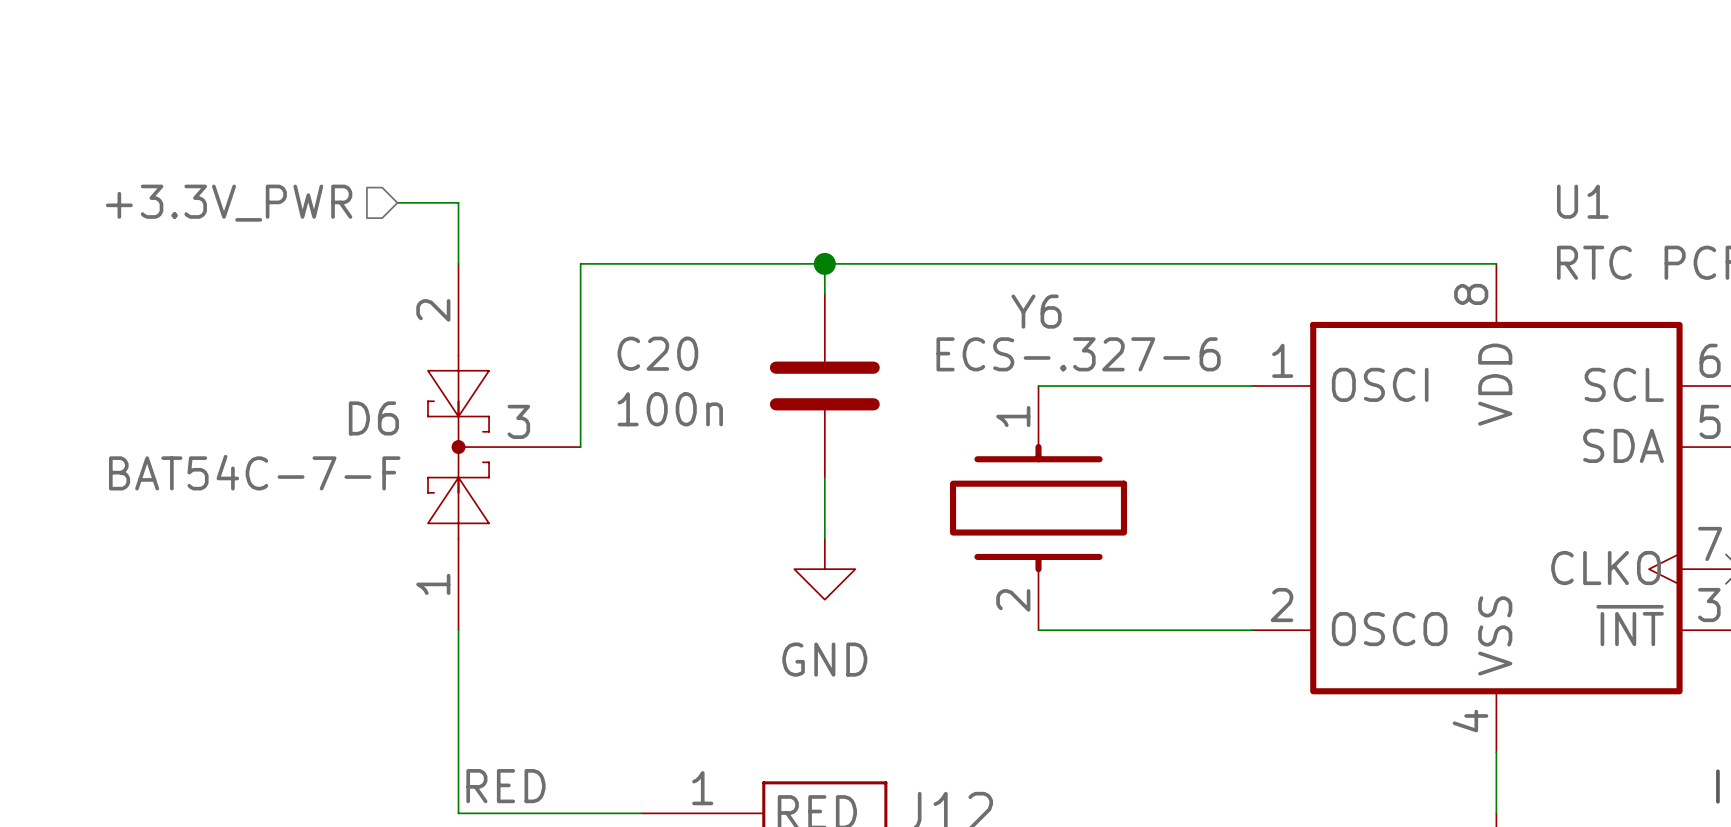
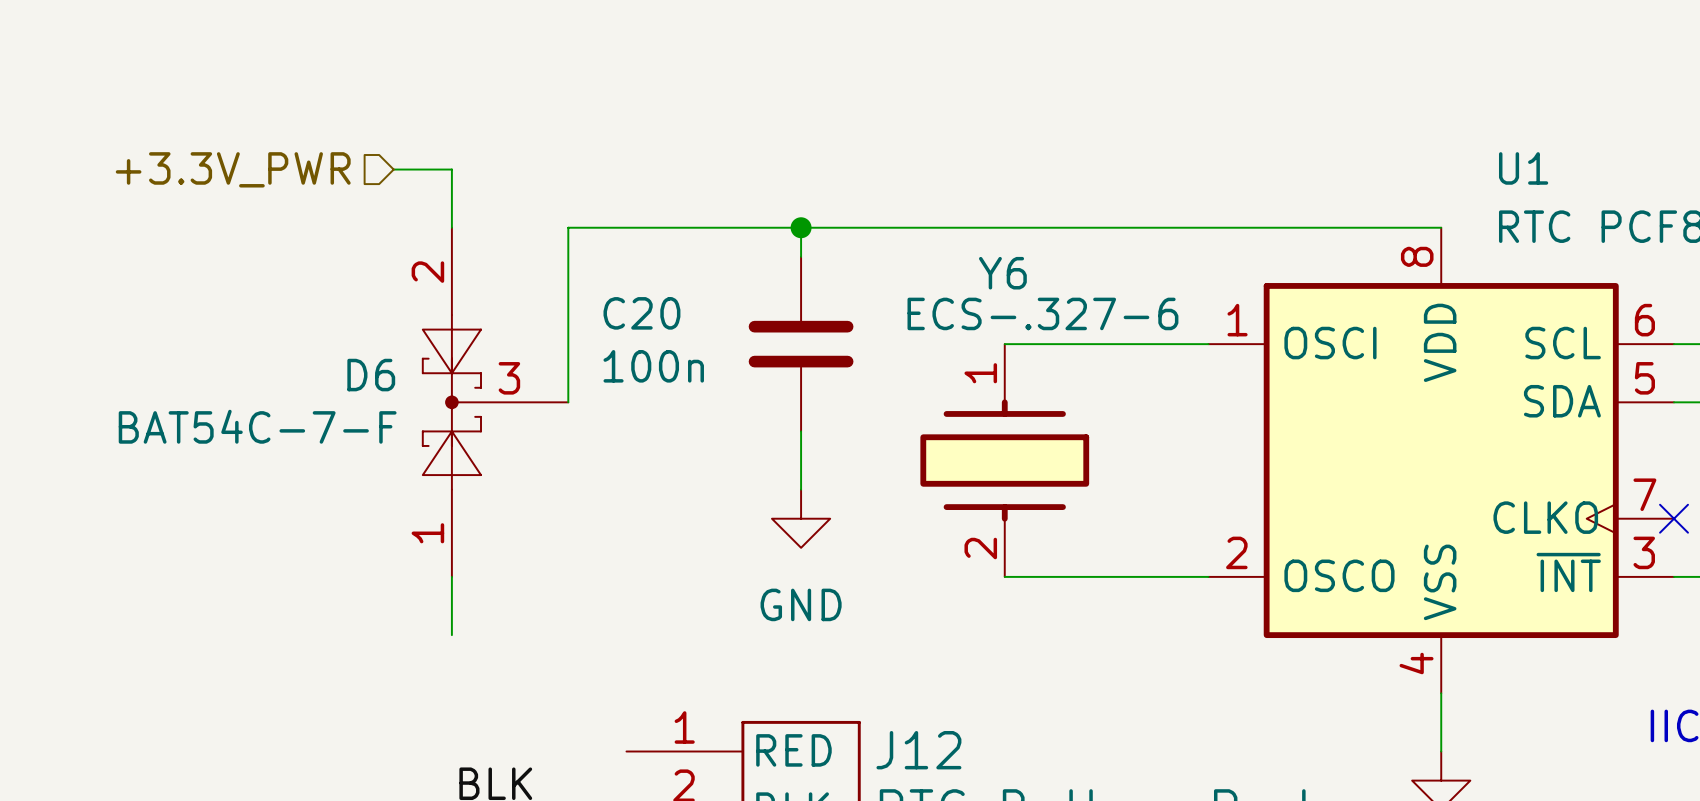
wire: (458, 691) (458, 813) (641, 813) -> none
label: RED (505, 786) -> none

